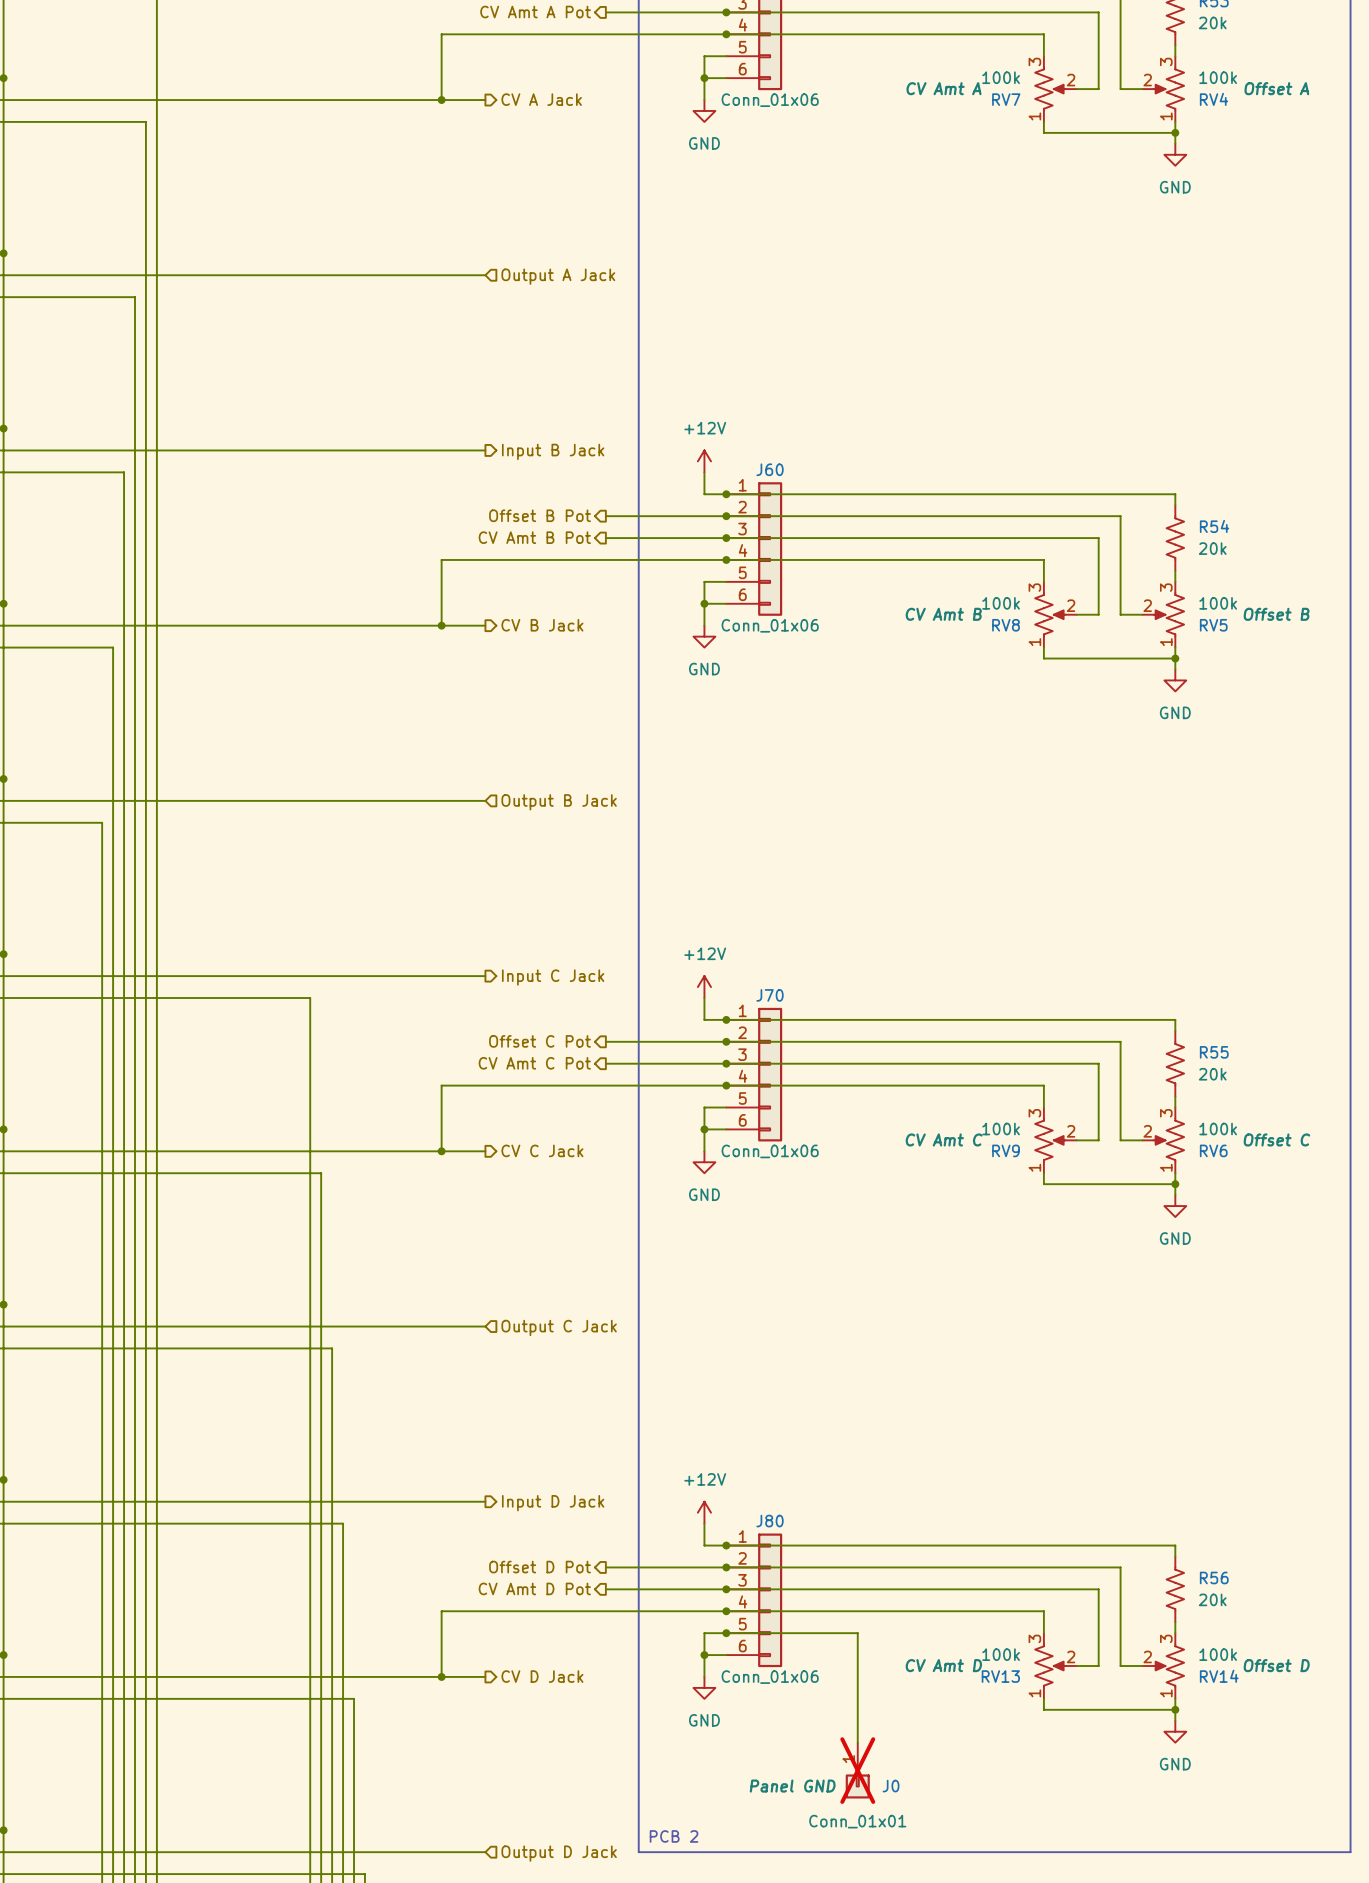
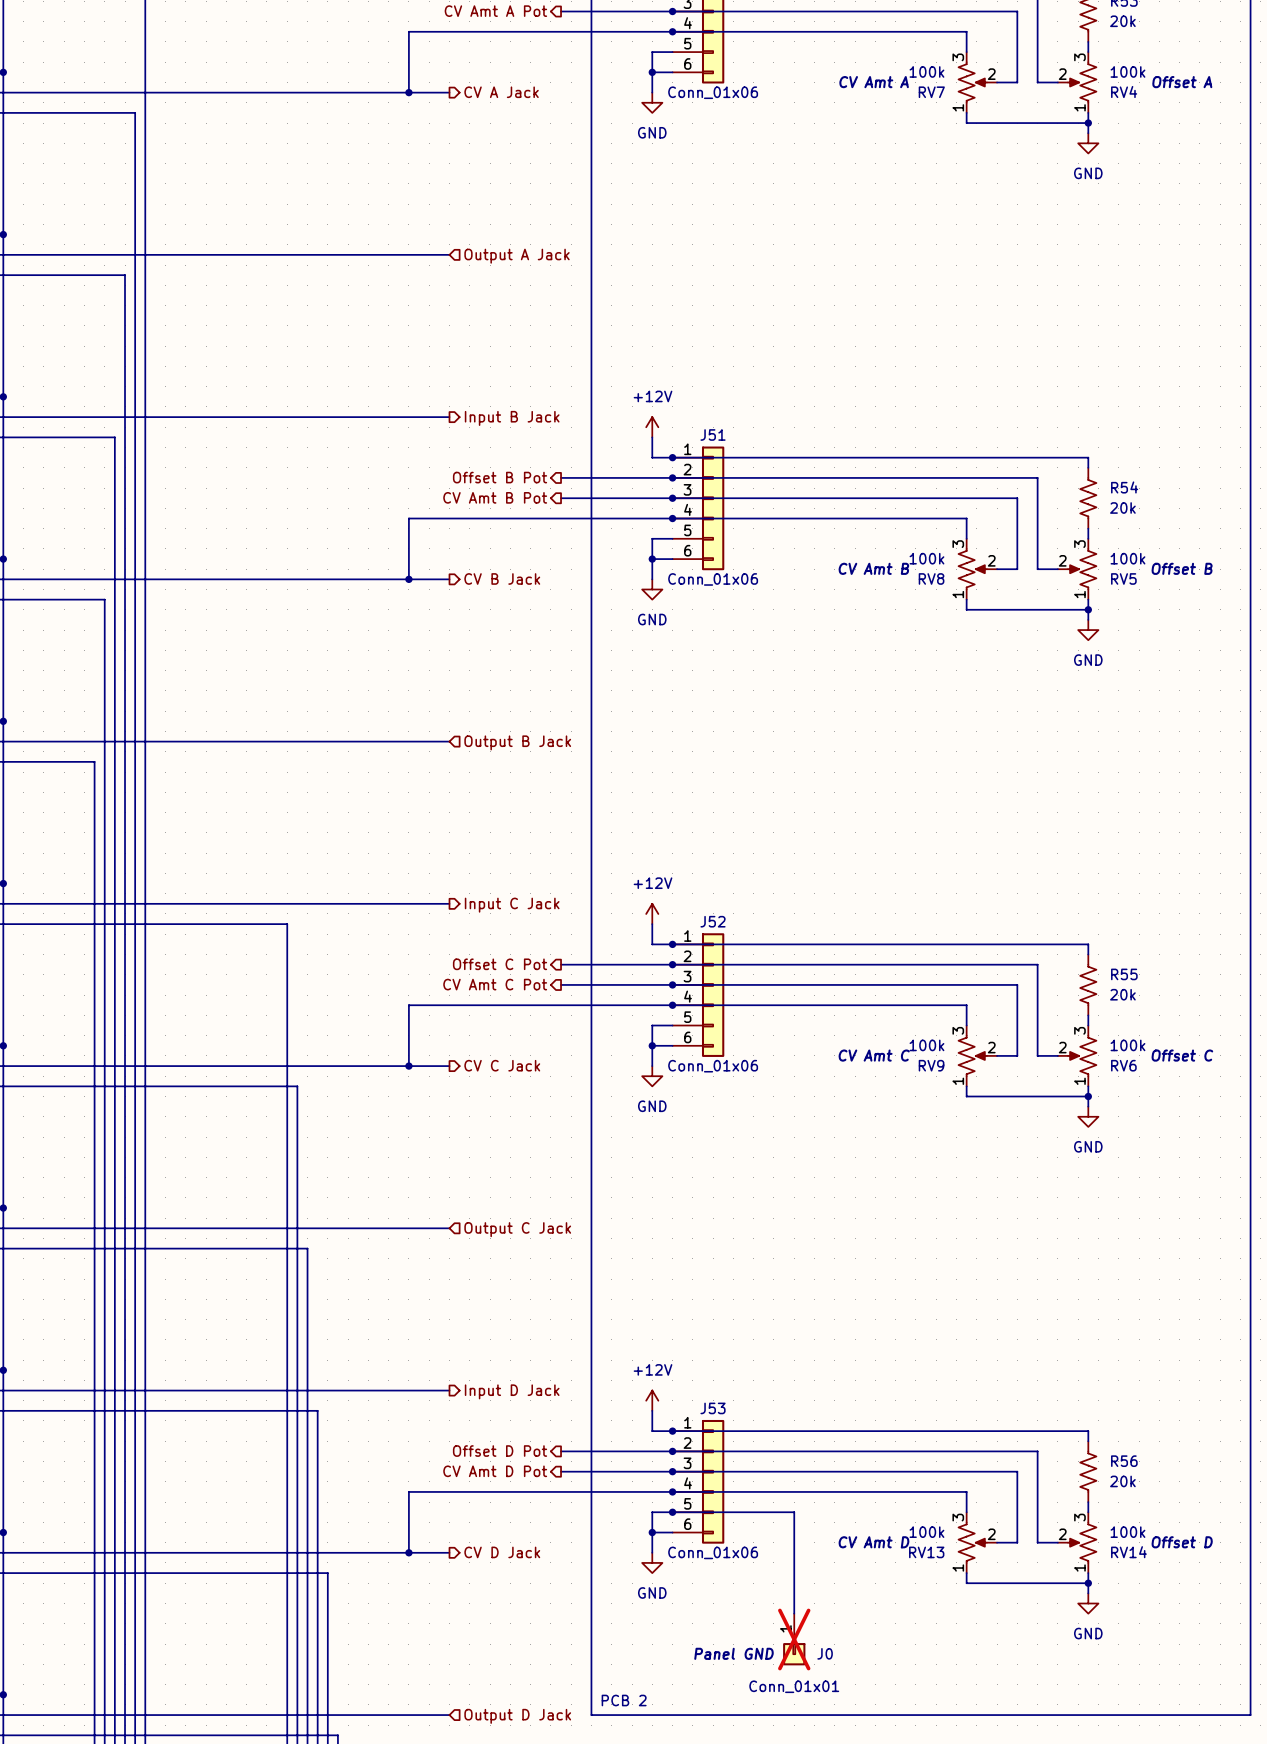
J60 name: J60 (770, 469) -> J51 (713, 434)
J70 name: J70 (770, 995) -> J52 (713, 921)
J80 name: J80 (770, 1521) -> J53 (713, 1408)

